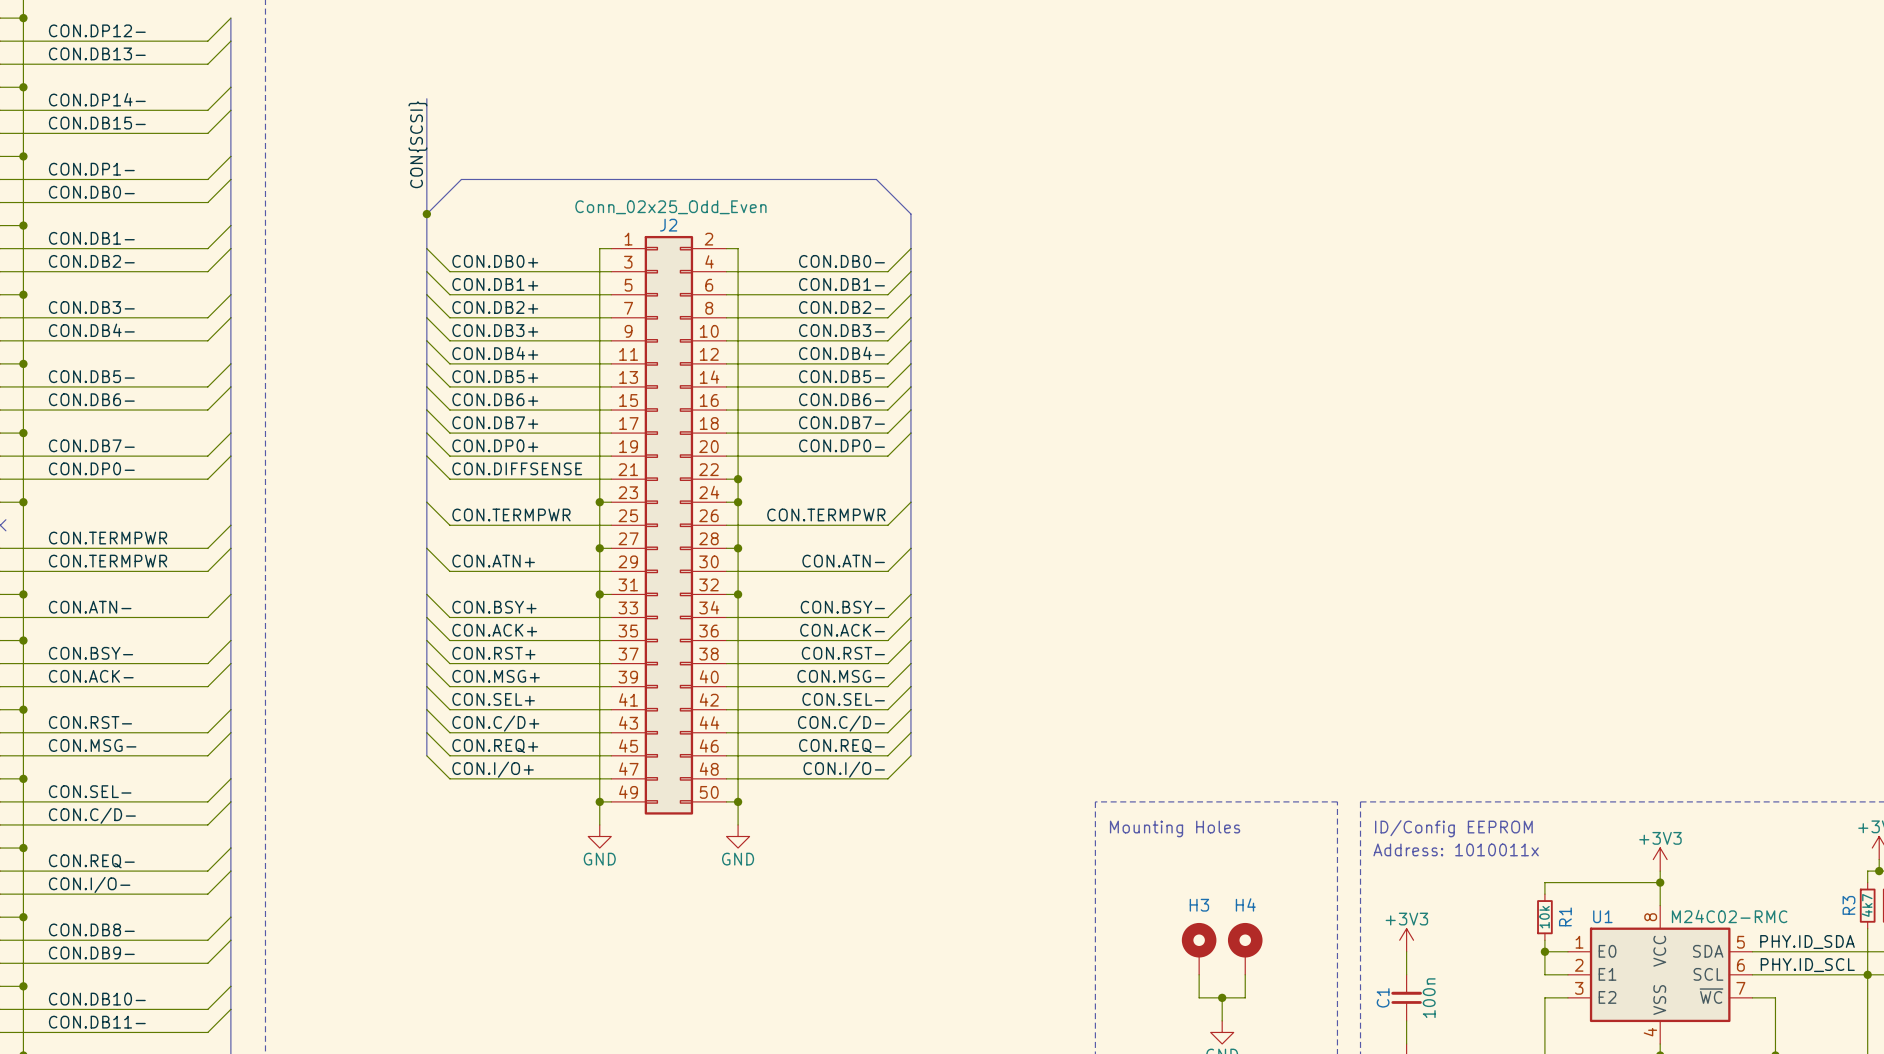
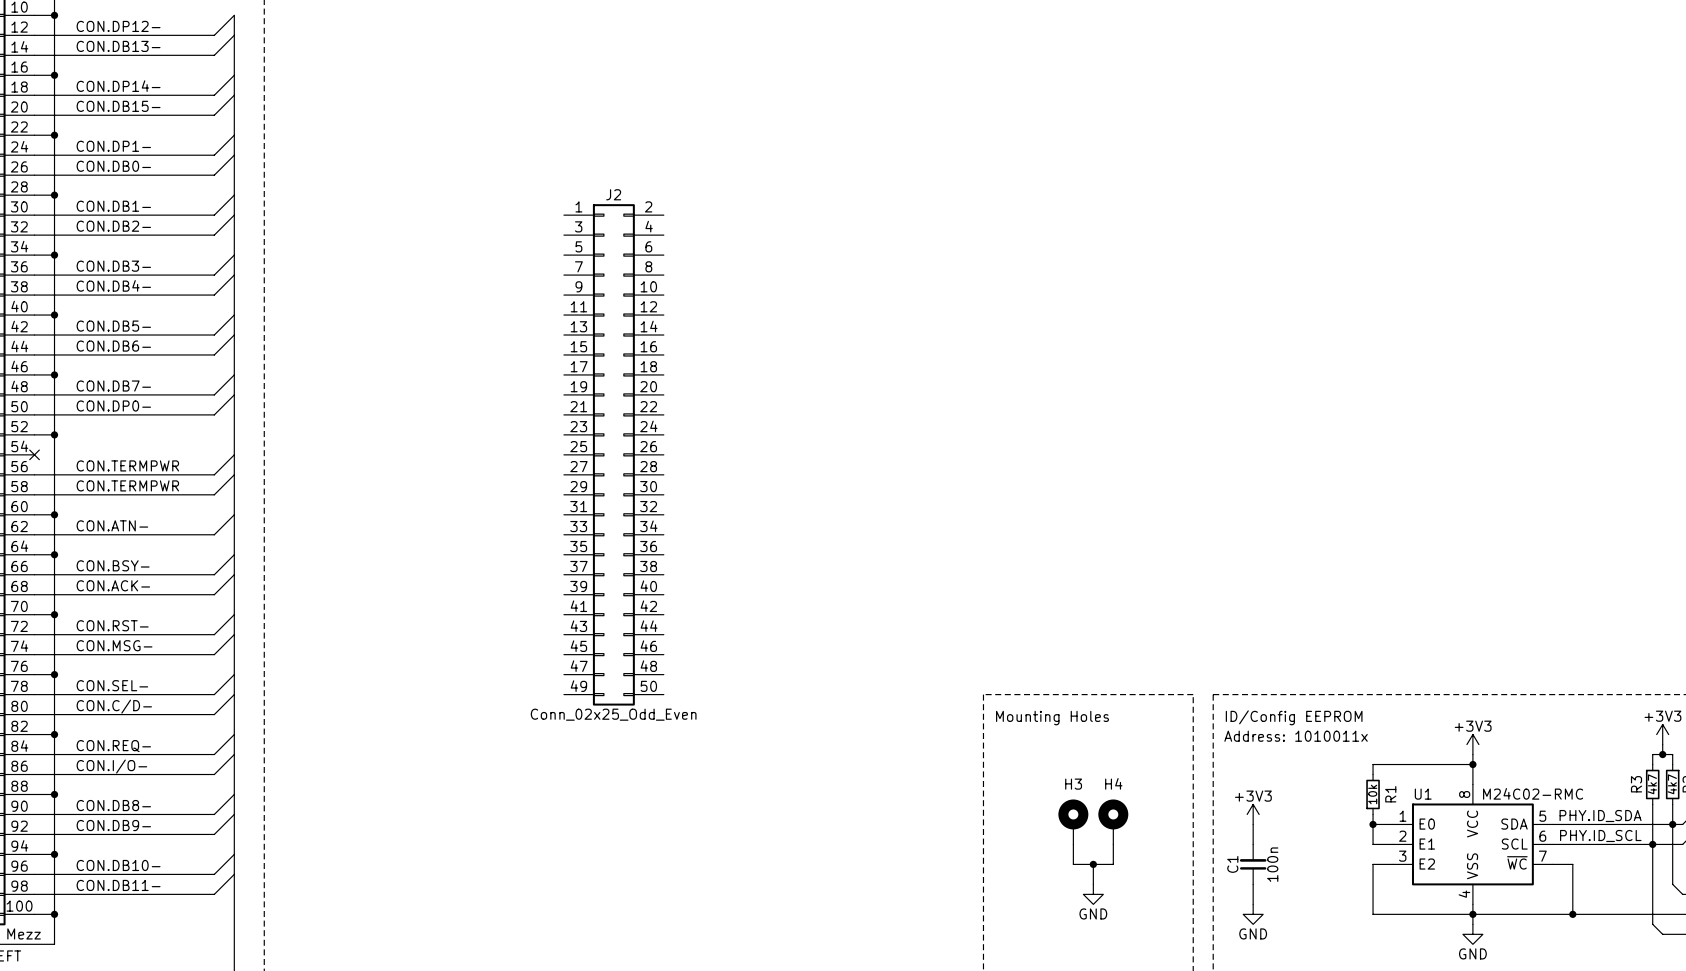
bus: (426, 98) (426, 755) -> none
label: CON{SCSI} (417, 144) -> none
J2 value position: Conn_02x25_Odd_Even (670, 207) -> Conn_02x25_Odd_Even (613, 714)
bus: (426, 214) (461, 179) (876, 179) (910, 214) (910, 755) -> none
junction: (426, 214) -> none
wire: (426, 248) (449, 271) (611, 271) -> none
wire: (611, 248) (599, 248) (599, 824) -> none
wire: (726, 248) (738, 248) (738, 824) -> none
wire: (910, 248) (887, 271) (726, 271) -> none
label: CON.DB0+ (495, 261) -> none
label: CON.DB0- (841, 261) -> none
wire: (426, 271) (449, 294) (611, 294) -> none
wire: (910, 271) (887, 294) (726, 294) -> none
label: CON.DB1+ (495, 284) -> none
label: CON.DB1- (841, 284) -> none
wire: (426, 294) (449, 317) (611, 317) -> none
wire: (910, 294) (887, 317) (726, 317) -> none
label: CON.DB2+ (495, 307) -> none
label: CON.DB2- (841, 307) -> none
wire: (426, 317) (449, 340) (611, 340) -> none
wire: (910, 317) (887, 340) (726, 340) -> none
label: CON.DB3+ (495, 330) -> none
label: CON.DB3- (841, 330) -> none
wire: (426, 340) (449, 363) (611, 363) -> none
wire: (910, 340) (887, 363) (726, 363) -> none
label: CON.DB4+ (495, 353) -> none
label: CON.DB4- (841, 353) -> none
wire: (426, 363) (449, 386) (611, 386) -> none
wire: (910, 363) (887, 386) (726, 386) -> none
label: CON.DB5+ (495, 376) -> none
label: CON.DB5- (841, 376) -> none
wire: (426, 386) (449, 410) (611, 410) -> none
wire: (910, 386) (887, 410) (726, 410) -> none
label: CON.DB6+ (495, 399) -> none
label: CON.DB6- (841, 399) -> none
wire: (426, 410) (449, 433) (611, 433) -> none
wire: (910, 410) (887, 433) (726, 433) -> none
label: CON.DB7+ (495, 422) -> none
label: CON.DB7- (841, 422) -> none
wire: (426, 433) (449, 456) (611, 456) -> none
wire: (910, 433) (887, 456) (726, 456) -> none
label: CON.DP0+ (495, 445) -> none
label: CON.DP0- (841, 445) -> none
wire: (426, 456) (449, 479) (611, 479) -> none
label: CON.DIFFSENSE (517, 468) -> none
wire: (726, 479) (738, 479) -> none
junction: (738, 479) -> none
wire: (426, 502) (449, 525) (611, 525) -> none
wire: (599, 502) (611, 502) -> none
junction: (599, 502) -> none
wire: (726, 502) (738, 502) -> none
junction: (738, 502) -> none
wire: (910, 502) (887, 525) (726, 525) -> none
label: CON.TERMPWR (511, 514) -> none
label: CON.TERMPWR (826, 514) -> none
wire: (426, 548) (449, 571) (611, 571) -> none
wire: (599, 548) (611, 548) -> none
junction: (599, 548) -> none
wire: (726, 548) (738, 548) -> none
junction: (738, 548) -> none
wire: (910, 548) (887, 571) (726, 571) -> none
label: CON.ATN+ (493, 561) -> none
label: CON.ATN- (843, 561) -> none
wire: (426, 594) (449, 617) (611, 617) -> none
wire: (599, 594) (611, 594) -> none
junction: (599, 594) -> none
wire: (726, 594) (738, 594) -> none
junction: (738, 594) -> none
wire: (910, 594) (887, 617) (726, 617) -> none
label: CON.BSY+ (494, 607) -> none
label: CON.BSY- (842, 607) -> none
wire: (426, 617) (449, 640) (611, 640) -> none
wire: (910, 617) (887, 640) (726, 640) -> none
label: CON.ACK+ (494, 630) -> none
label: CON.ACK- (842, 630) -> none
wire: (426, 640) (449, 663) (611, 663) -> none
wire: (910, 640) (887, 663) (726, 663) -> none
label: CON.RST+ (493, 653) -> none
label: CON.RST- (843, 653) -> none
wire: (426, 663) (449, 686) (611, 686) -> none
wire: (910, 663) (887, 686) (726, 686) -> none
label: CON.MSG+ (496, 676) -> none
label: CON.MSG- (841, 676) -> none
wire: (426, 686) (449, 709) (611, 709) -> none
wire: (910, 686) (887, 709) (726, 709) -> none
label: CON.SEL+ (493, 699) -> none
label: CON.SEL- (843, 699) -> none
wire: (426, 709) (449, 732) (611, 732) -> none
wire: (910, 709) (887, 732) (726, 732) -> none
label: CON.C/D+ (495, 723) -> none
label: CON.C/D- (841, 723) -> none
wire: (426, 732) (449, 755) (611, 755) -> none
wire: (910, 732) (887, 755) (726, 755) -> none
label: CON.REQ+ (495, 746) -> none
label: CON.REQ- (841, 746) -> none
wire: (426, 755) (449, 778) (611, 778) -> none
wire: (910, 755) (887, 778) (726, 778) -> none
label: CON.I/O+ (493, 769) -> none
label: CON.I/O- (844, 769) -> none
wire: (599, 801) (611, 801) -> none
junction: (599, 801) -> none
wire: (726, 801) (738, 801) -> none
junction: (738, 801) -> none
power symbol: GND (599, 836) -> none
power symbol: GND (738, 836) -> none

